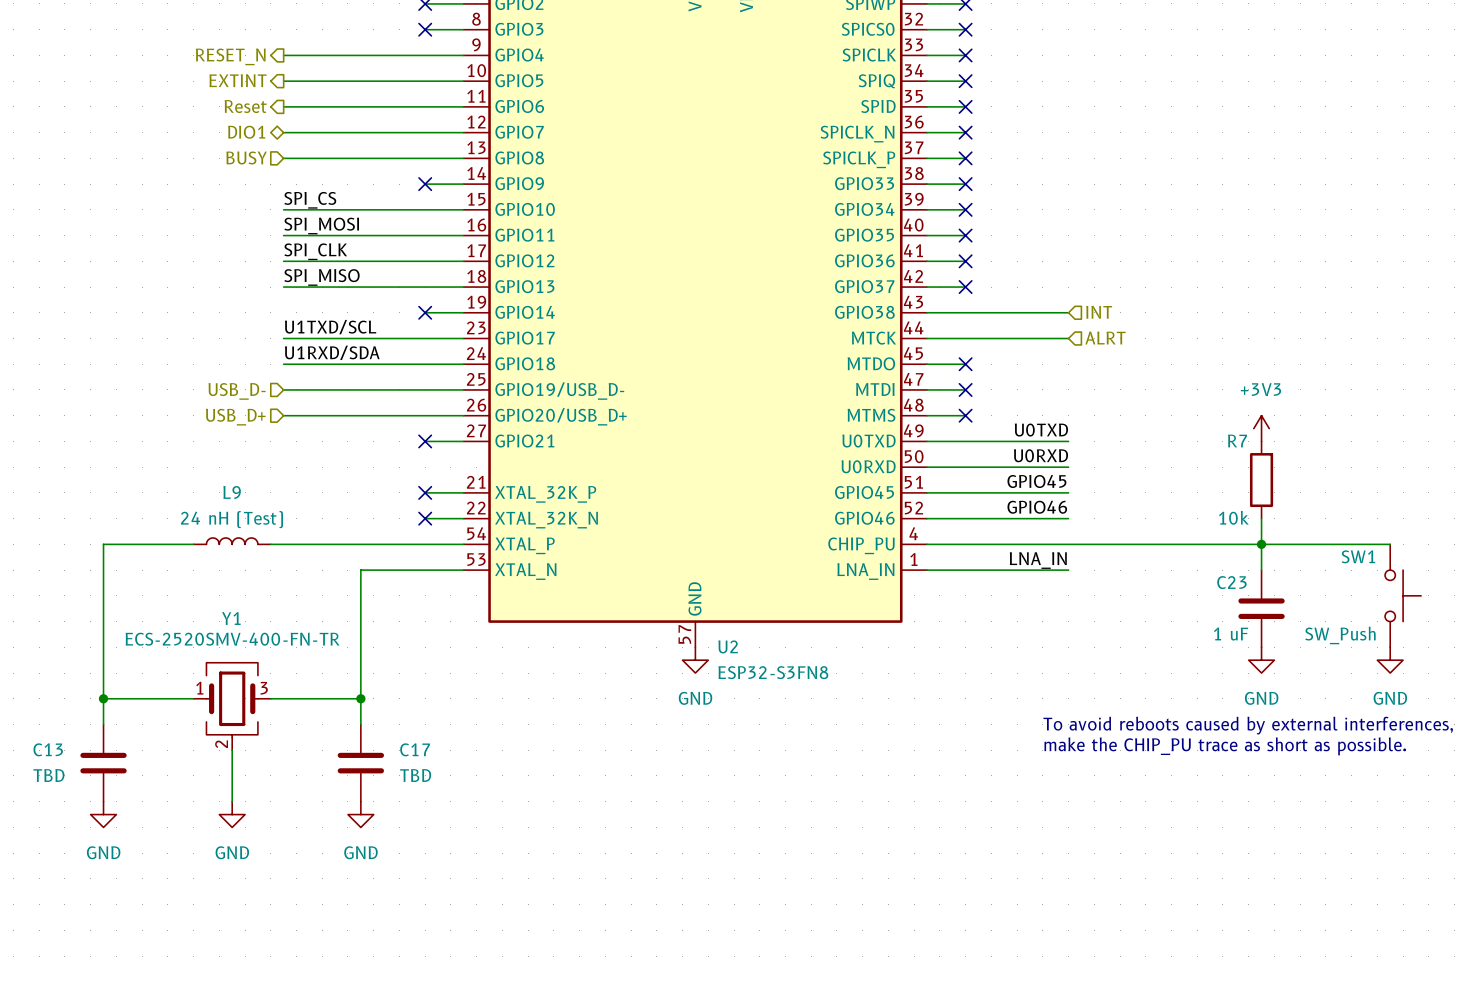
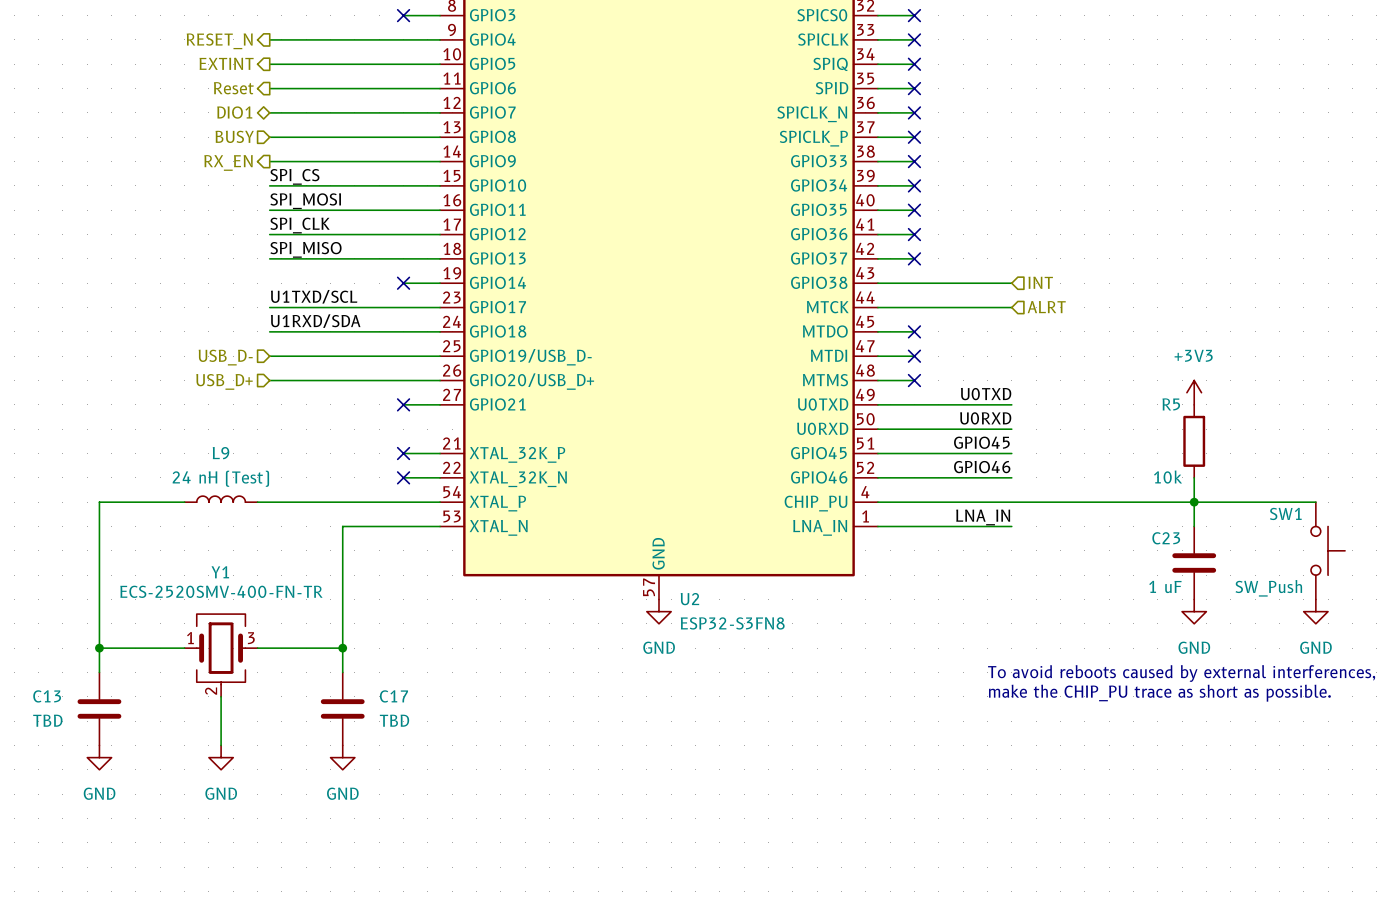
wire: none -> (269, 161) (403, 161)
no-connect mark: (425, 184) -> none
hierarchical label: none -> RX_EN (228, 162)
R7 name: R7 (1237, 440) -> R5 (1171, 404)

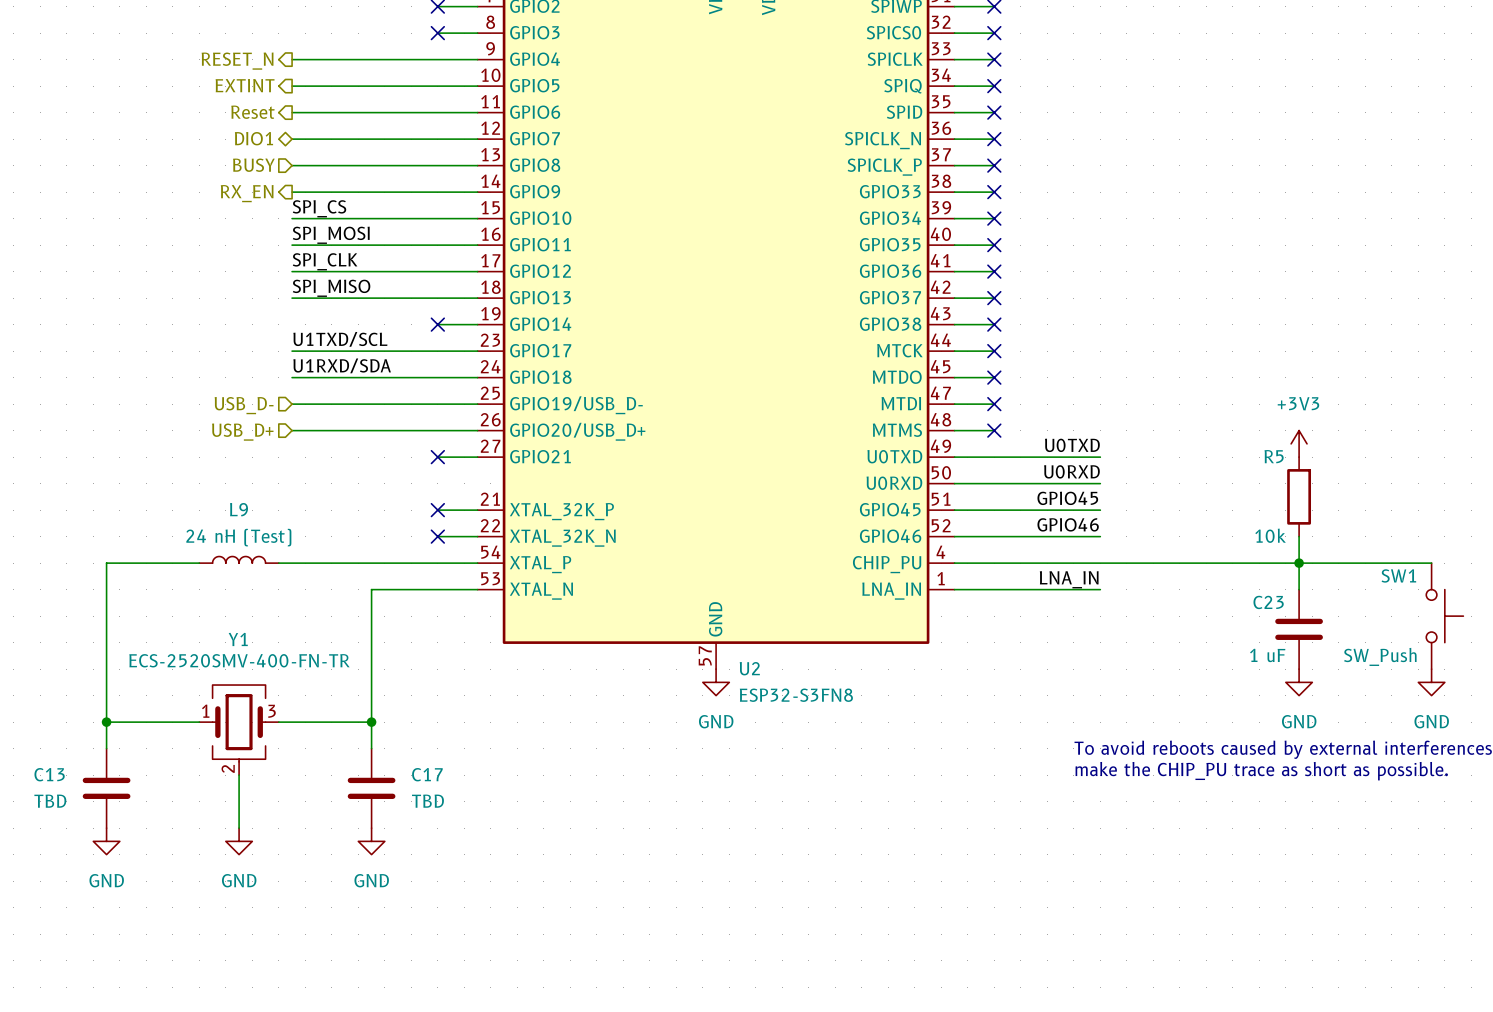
hierarchical label: INT (1040, 282) -> none
wire: (914, 283) (1011, 283) -> none
no-connect mark: none -> (994, 324)
wire: (914, 307) (1011, 307) -> none
no-connect mark: none -> (994, 351)
hierarchical label: ALRT (1046, 307) -> none

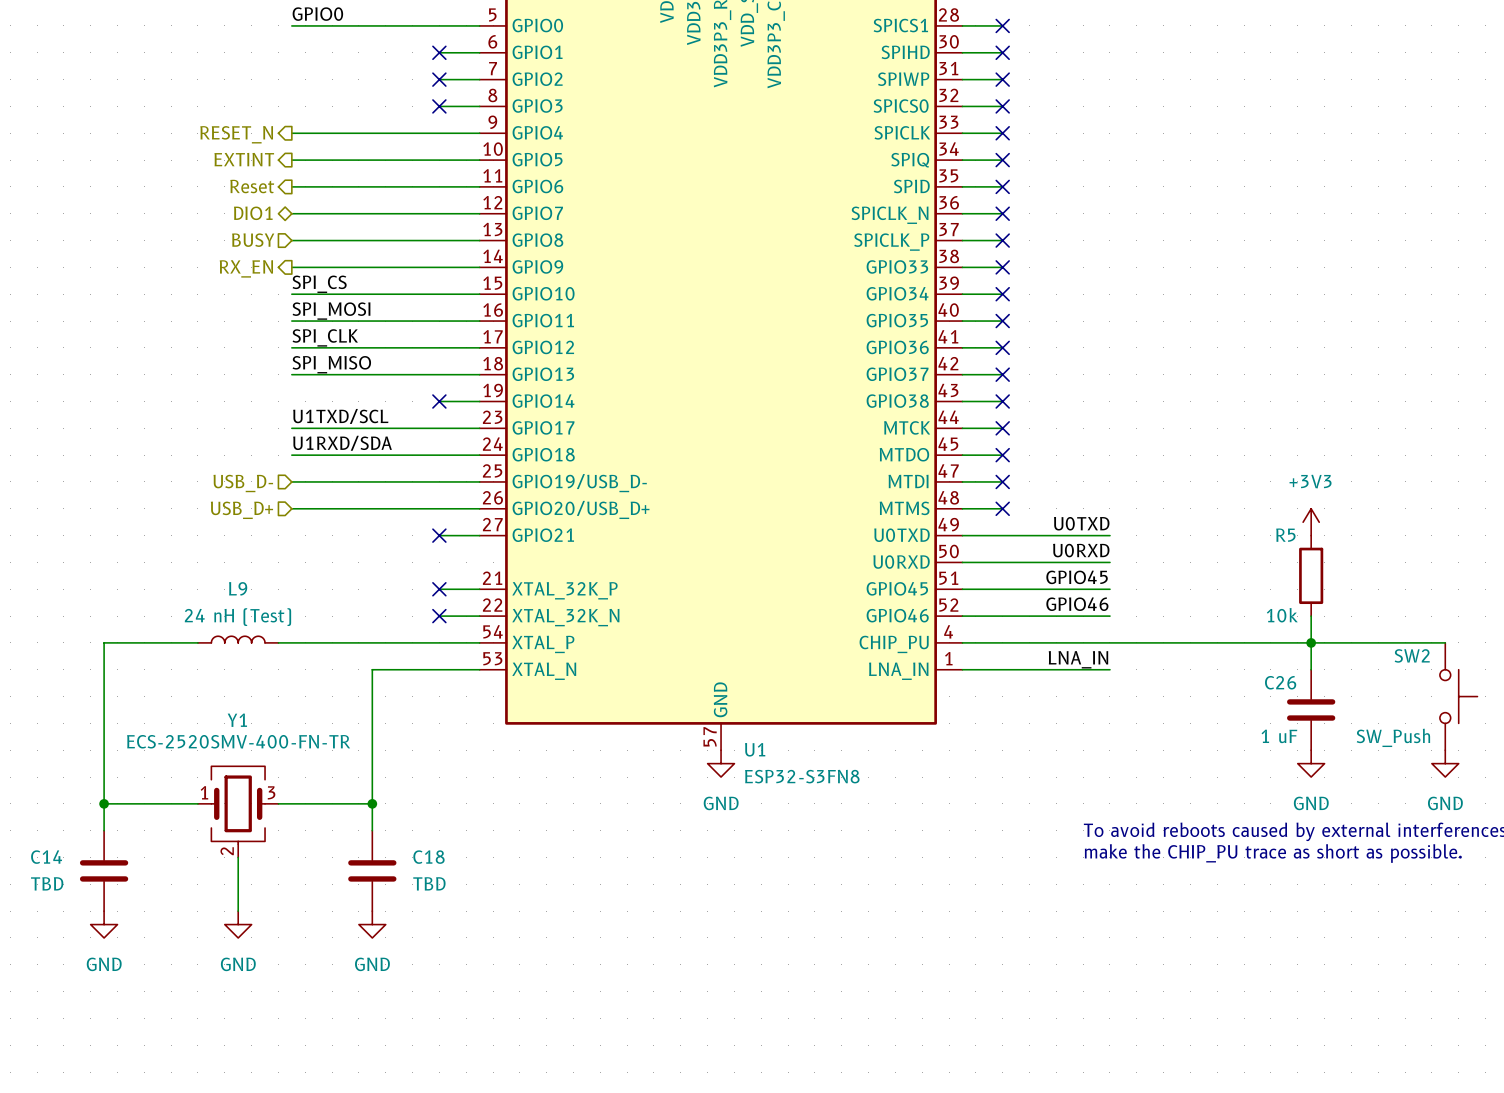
SW1 name: SW1 (1398, 575) -> SW2 (1412, 655)
C23 name: C23 (1268, 602) -> C26 (1280, 682)
U2 name: U2 (749, 668) -> U1 (755, 749)
C13 name: C13 (49, 774) -> C14 (46, 857)
C17 name: C17 (427, 774) -> C18 (428, 857)

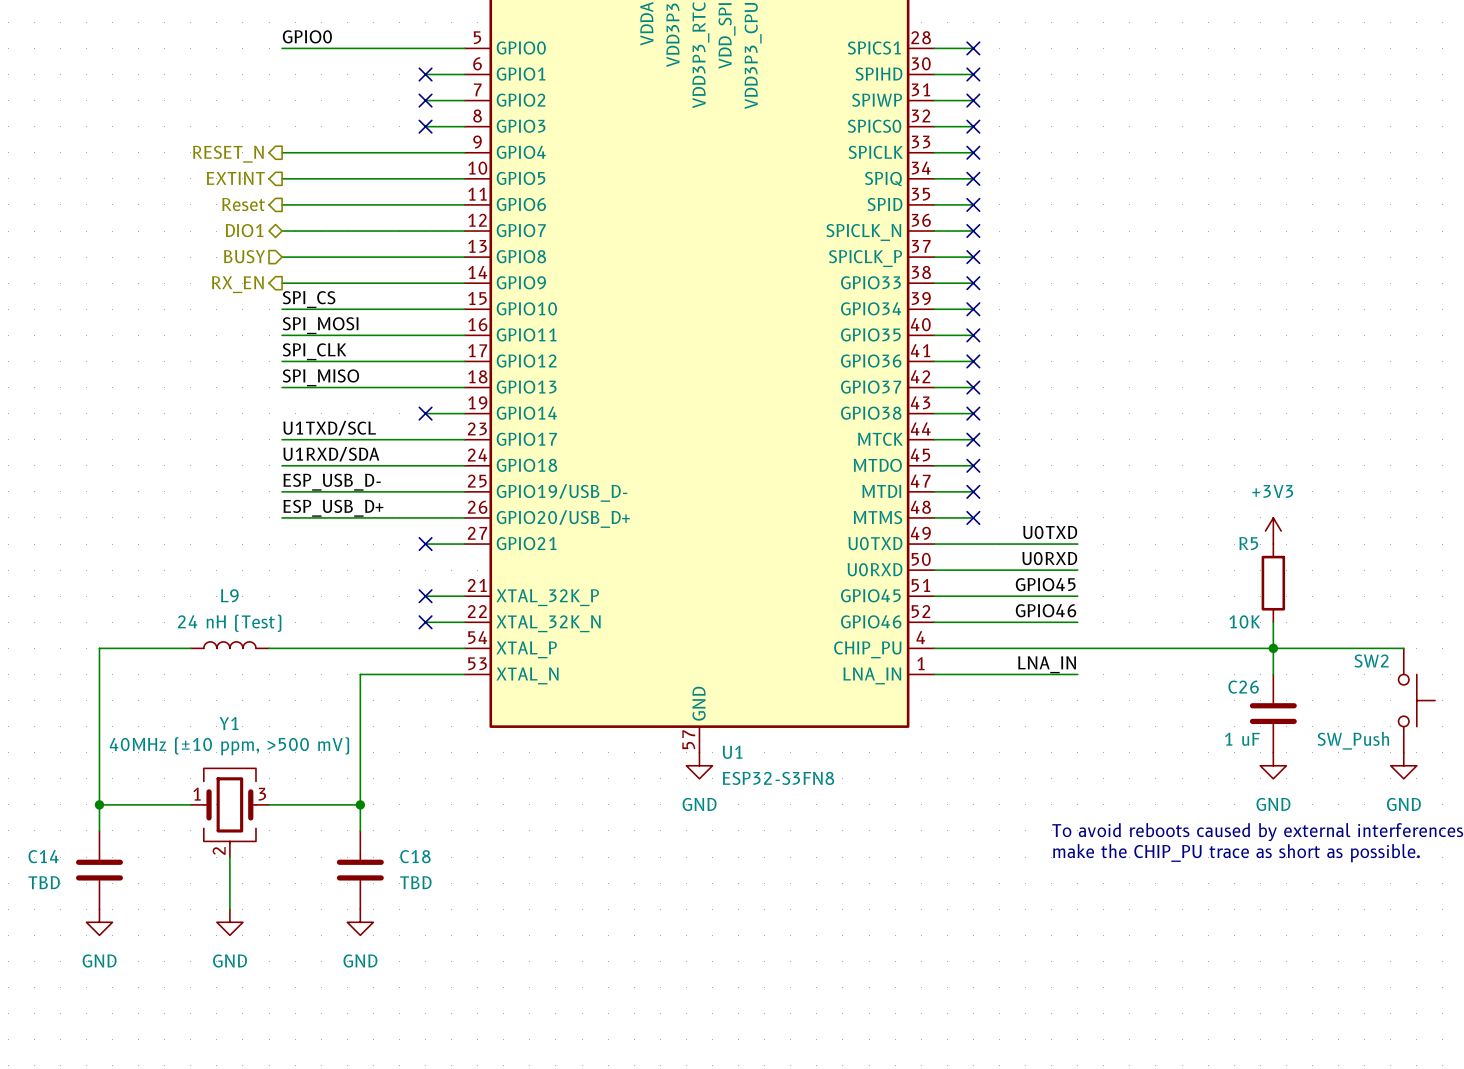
label: none -> ESP_USB_D- (332, 482)
hierarchical label: USB_D- (243, 483) -> none
label: none -> ESP_USB_D+ (333, 508)
hierarchical label: USB_D+ (241, 510) -> none
R5 value: 10k (1282, 615) -> 10K (1244, 621)
Y1 value: ECS-2520SMV-400-FN-TR (238, 741) -> 40MHz (±10 ppm, >500 mV) (229, 746)

